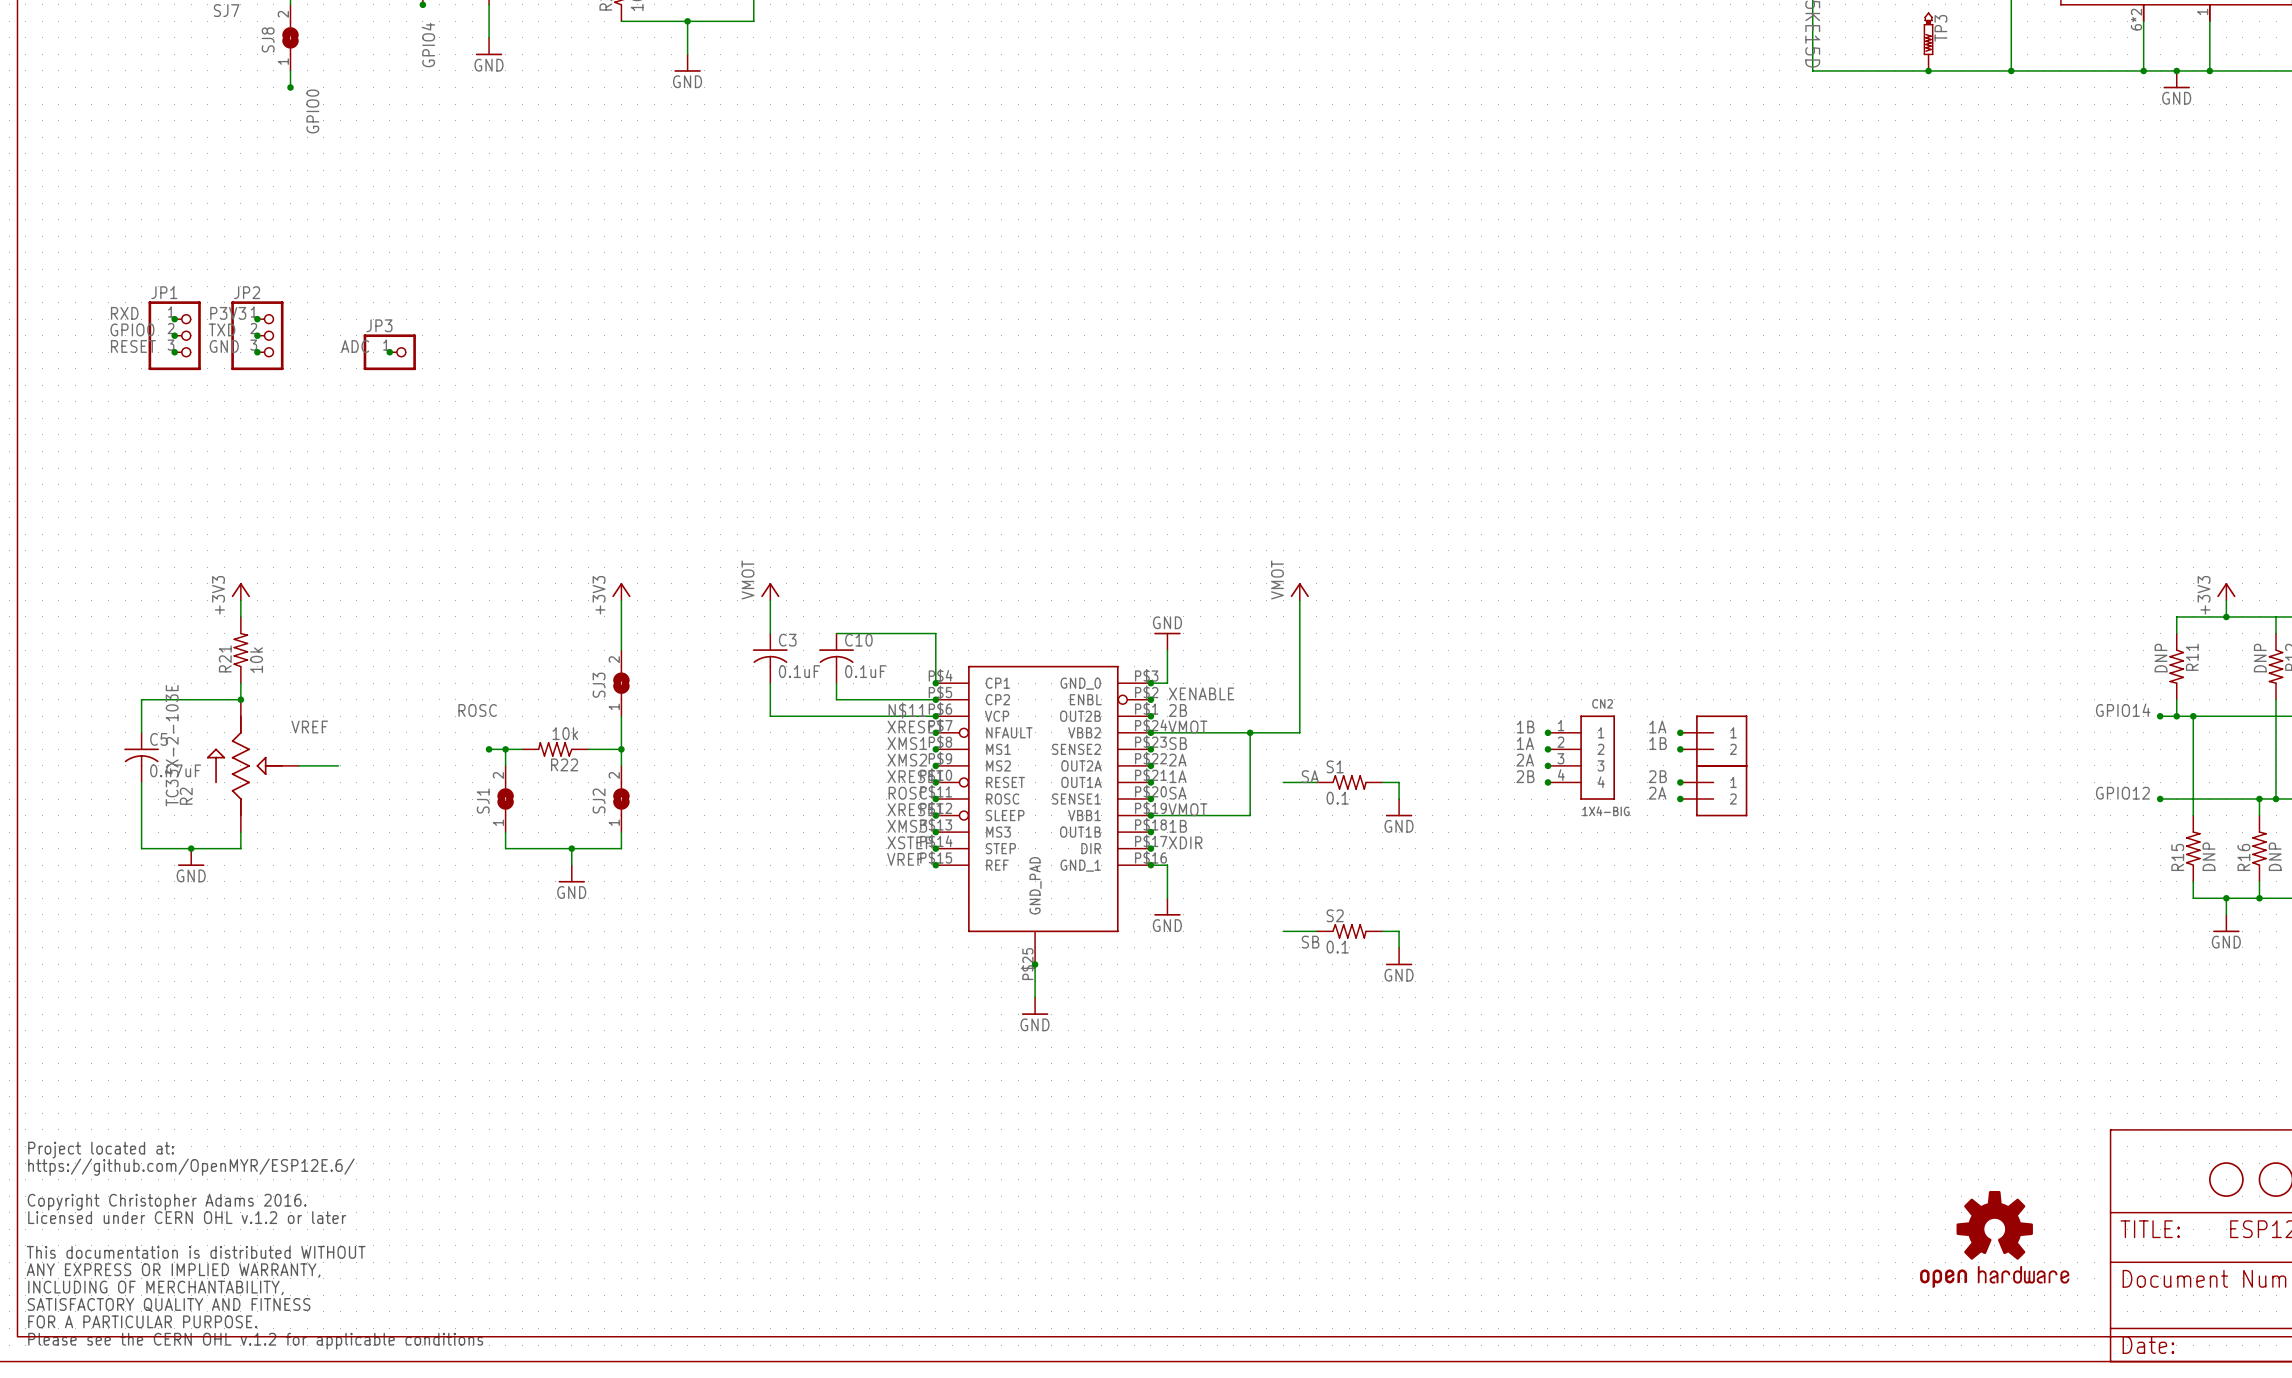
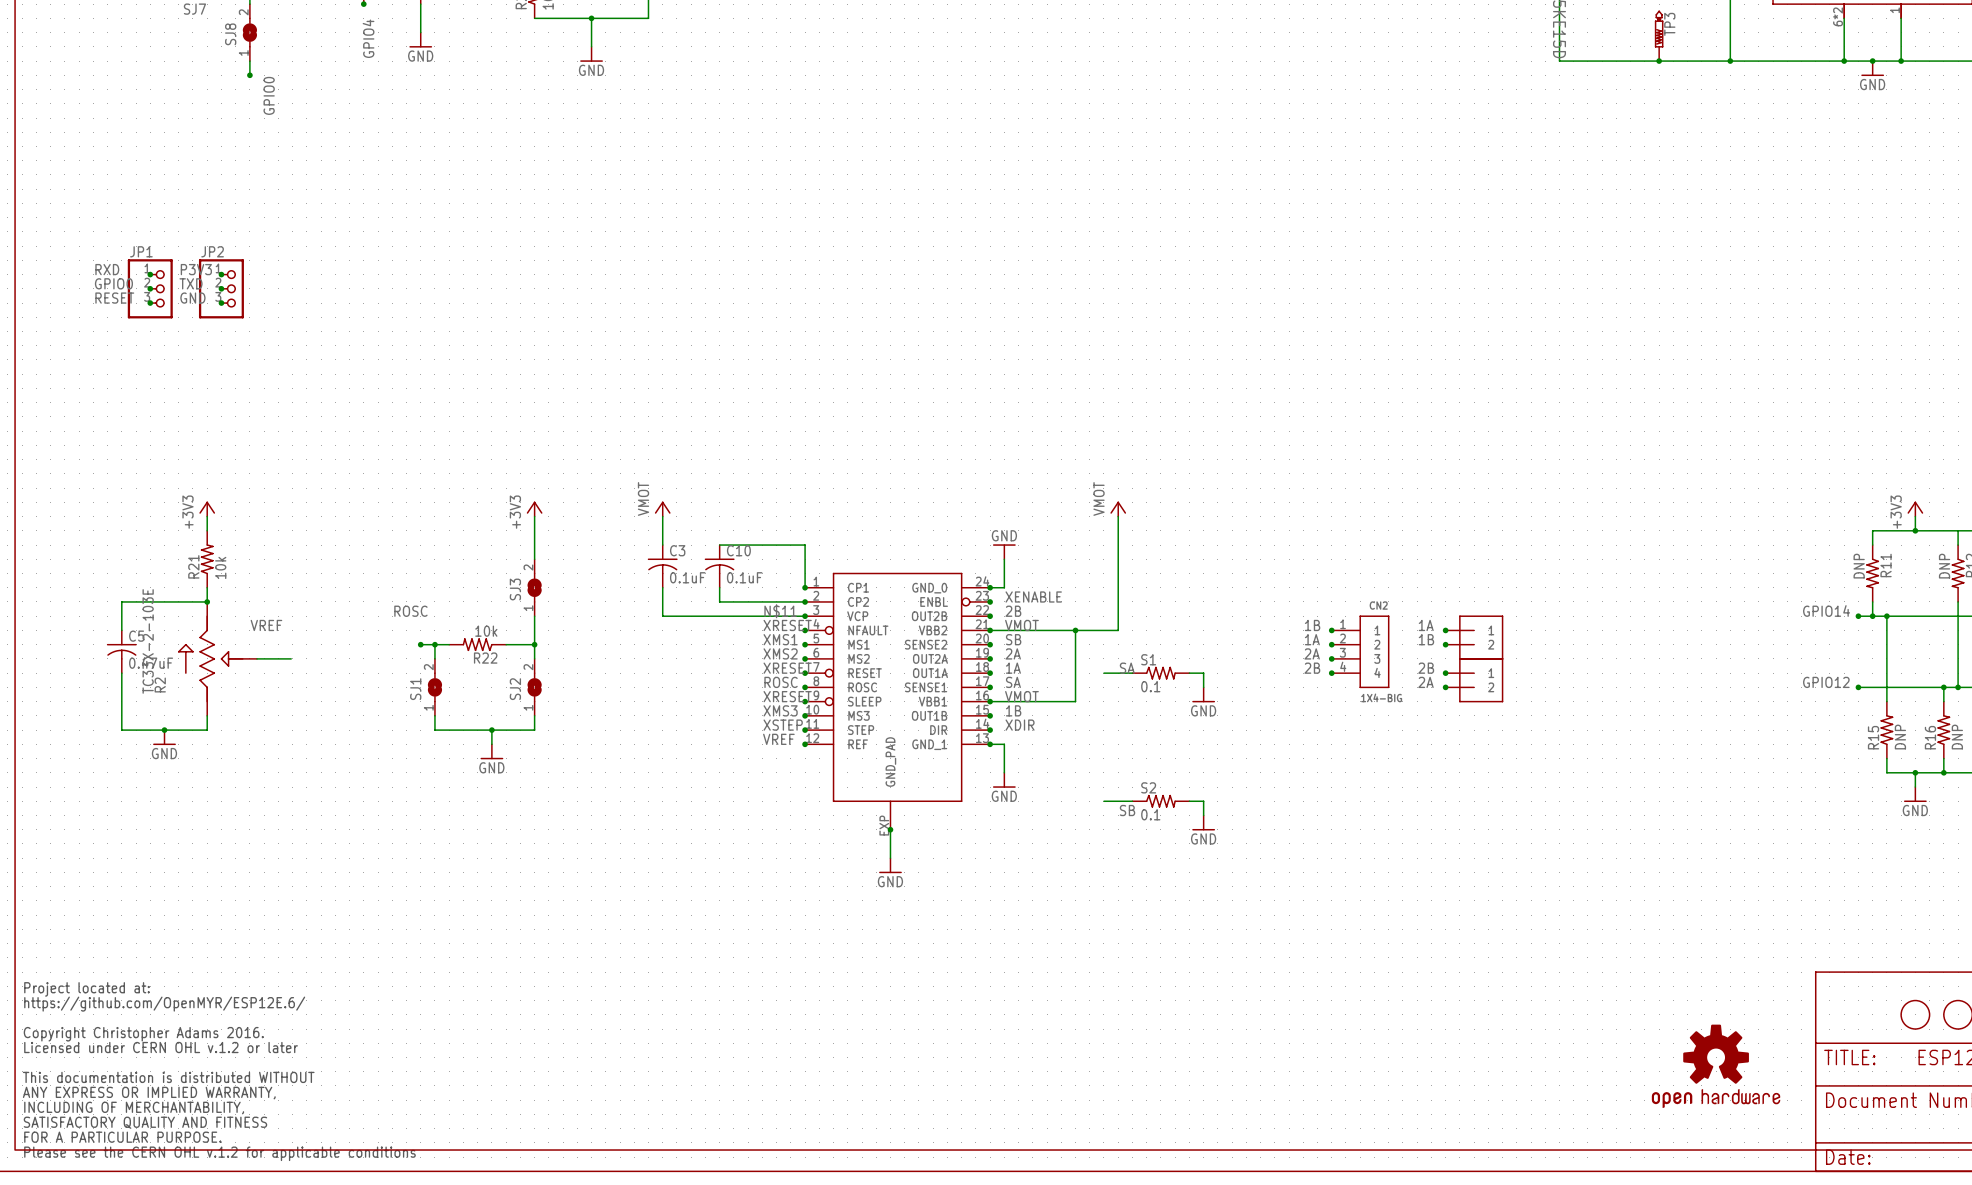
label: ADC (355, 346) -> none
JP3: (389, 352) -> none
junction: (389, 352) -> none
part symbol: [935, 665, 1151, 965] -> [805, 572, 991, 830]

